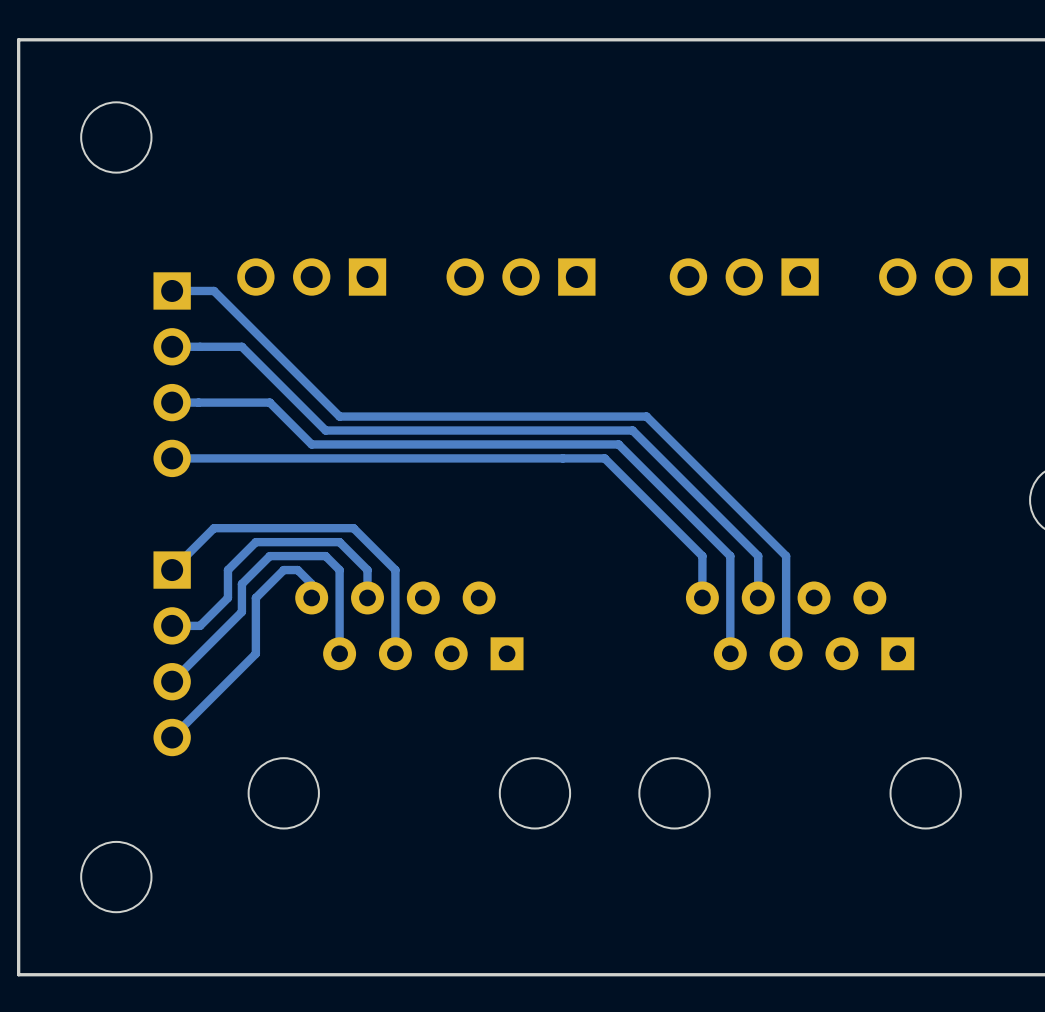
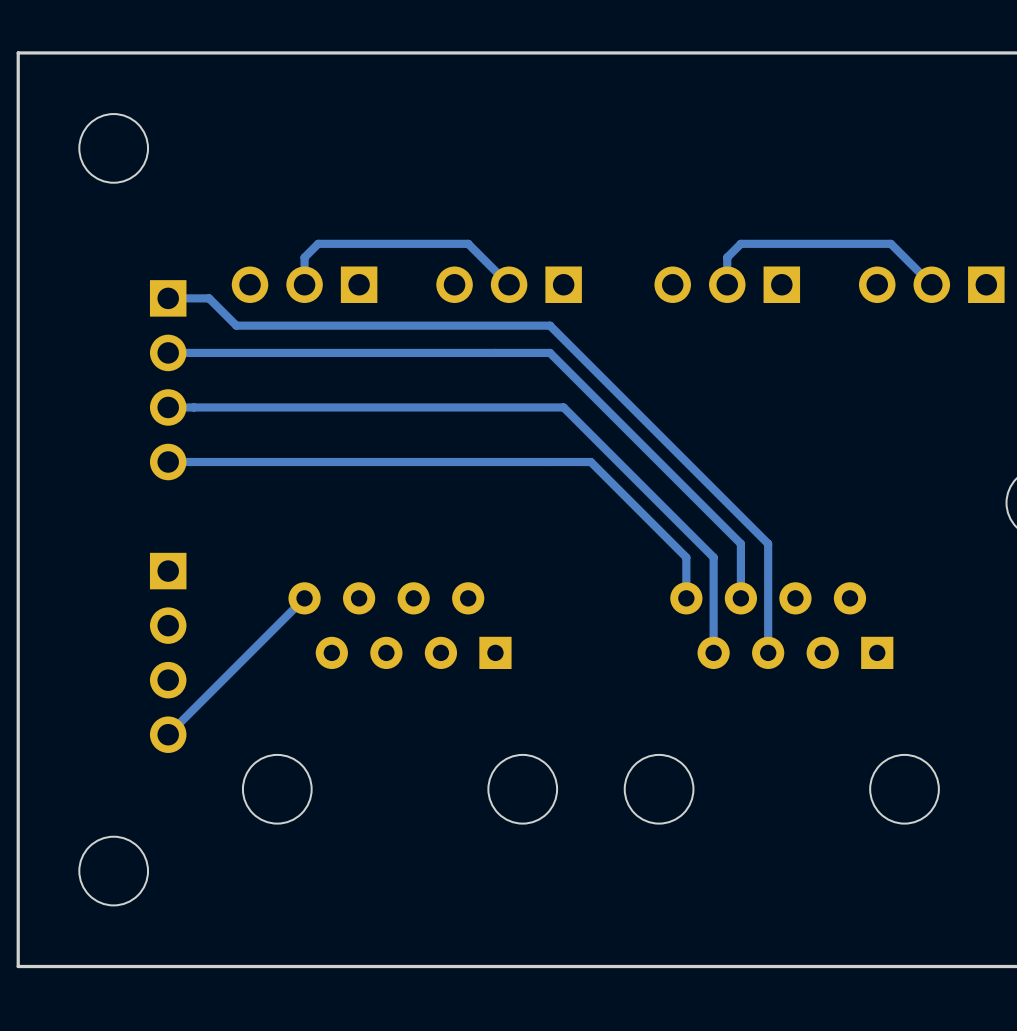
track: none -> (509, 284) (468, 243) (318, 243) (304, 257) (304, 284)
track: none -> (931, 284) (890, 243) (740, 243) (727, 257) (727, 284)
track: (241, 318) (339, 416) (646, 416) (786, 556) -> (236, 325) (550, 325) (768, 543) (768, 557)
track: (241, 346) (325, 430) (632, 430) (758, 556) -> (236, 352) (550, 352) (740, 543) (740, 557)
track: (269, 402) (311, 444) (618, 444) -> (263, 407) (563, 407) (604, 448)
track: (172, 570) (214, 528) (353, 528) (395, 570) (395, 653) -> none
track: (311, 597) (311, 584) (297, 570) (283, 570) (255, 597) (255, 653) -> (304, 598) (250, 652)
track: (367, 597) (367, 570) (339, 542) (255, 542) (227, 570) (227, 597) (200, 625) (172, 625) -> none
track: (339, 653) (339, 570) (325, 556) (269, 556) (241, 584) (241, 611) (172, 681) -> none

